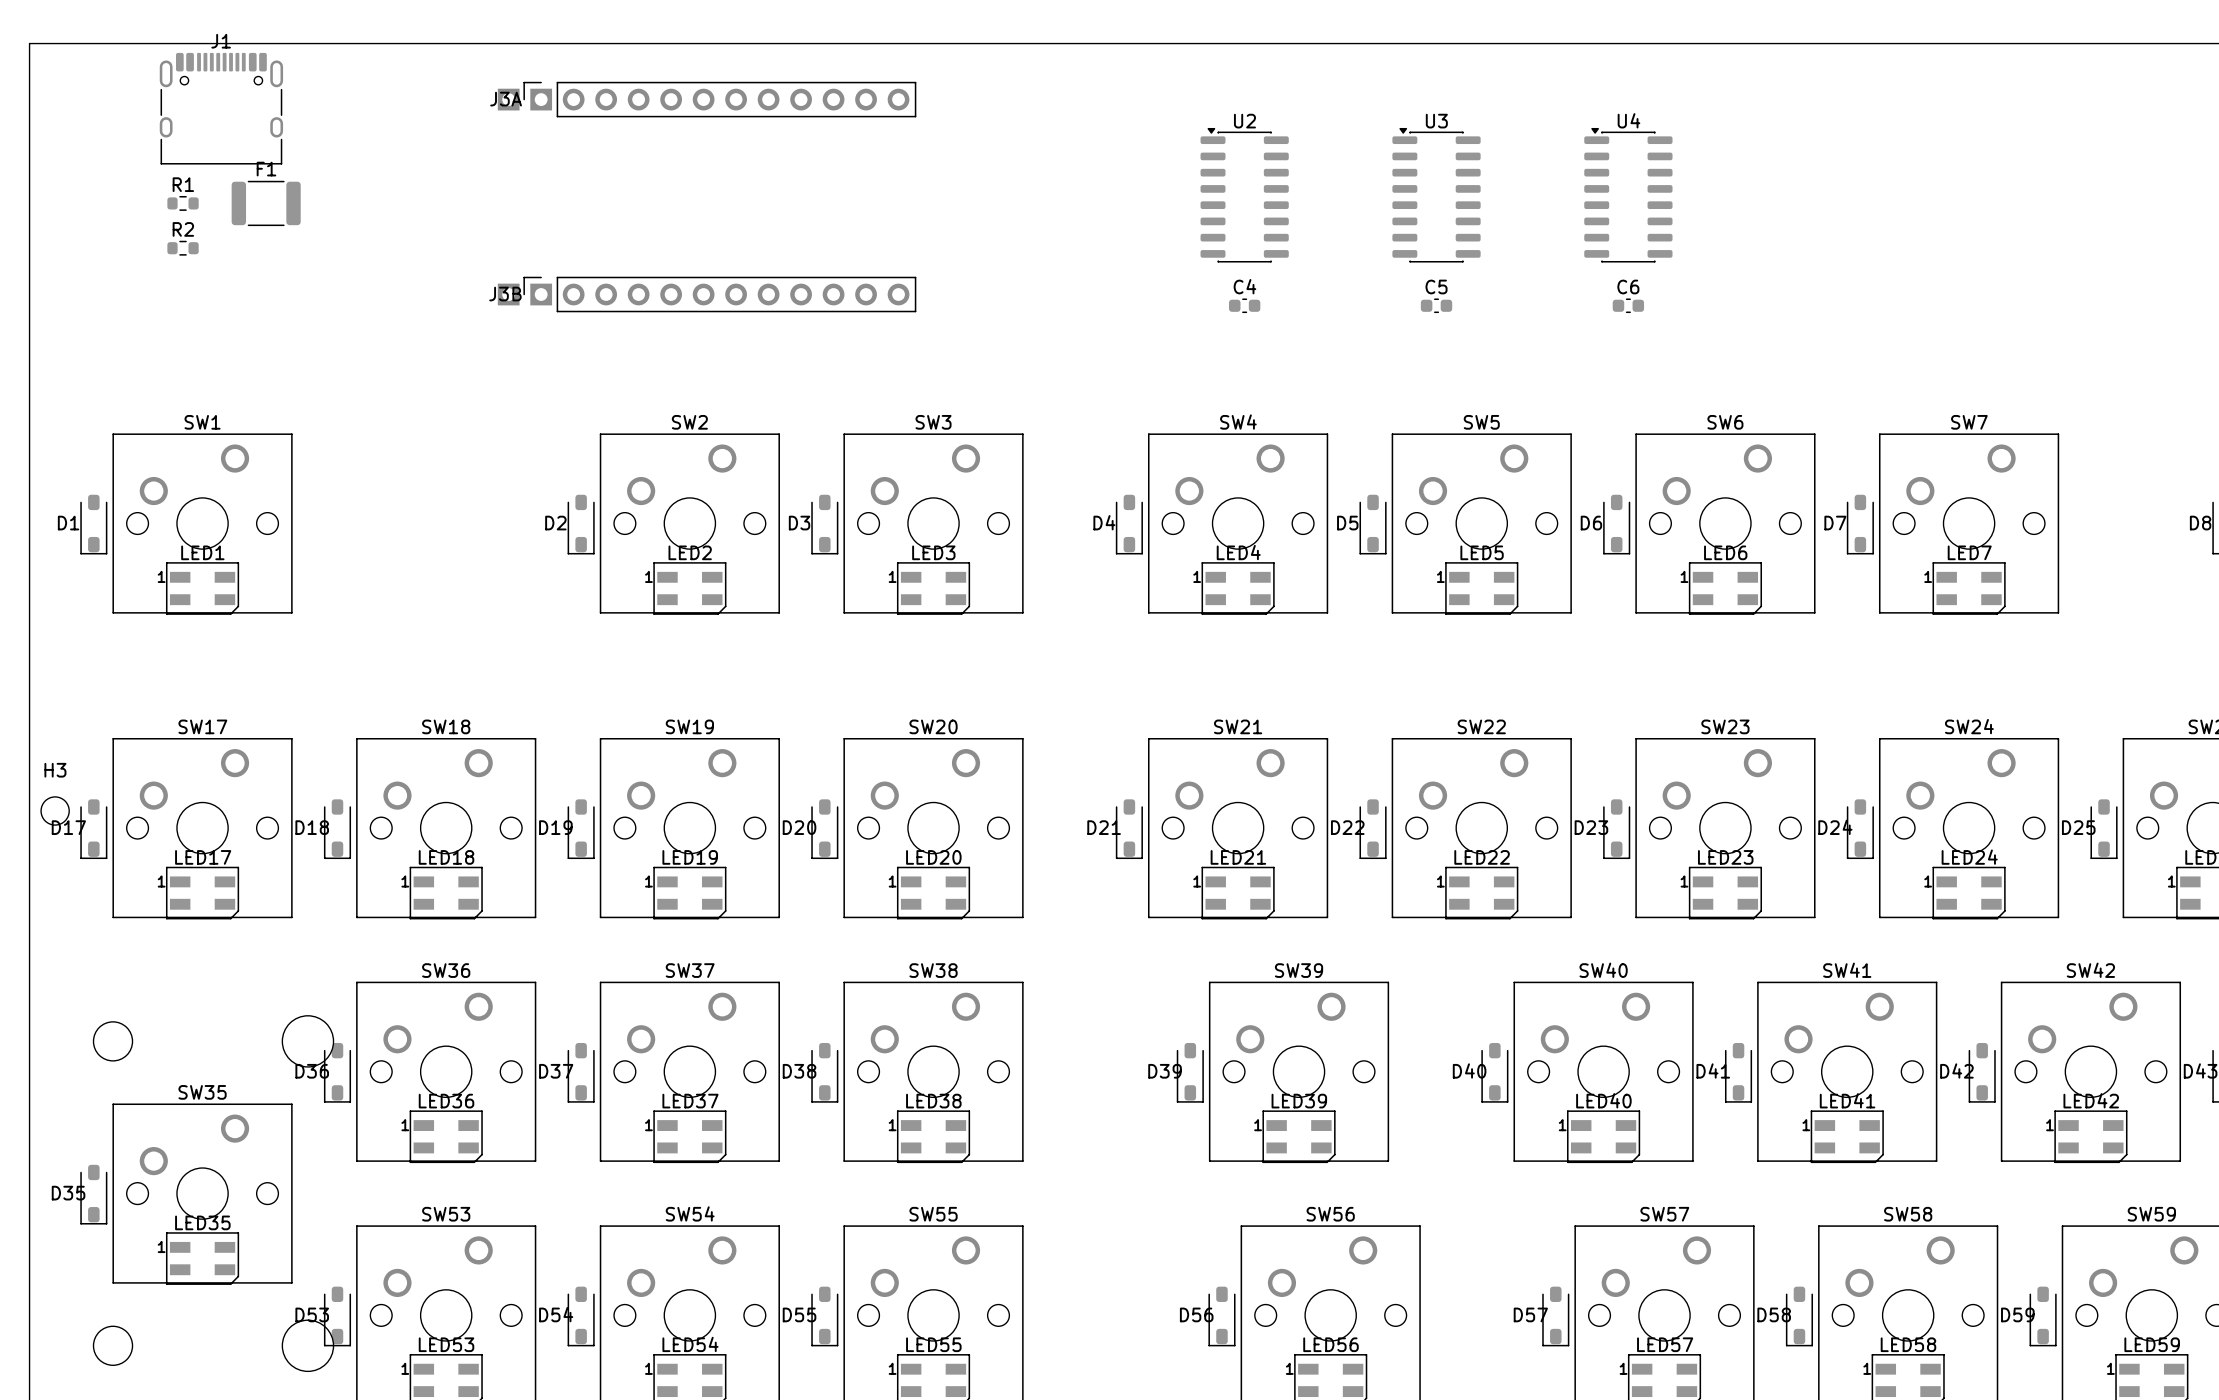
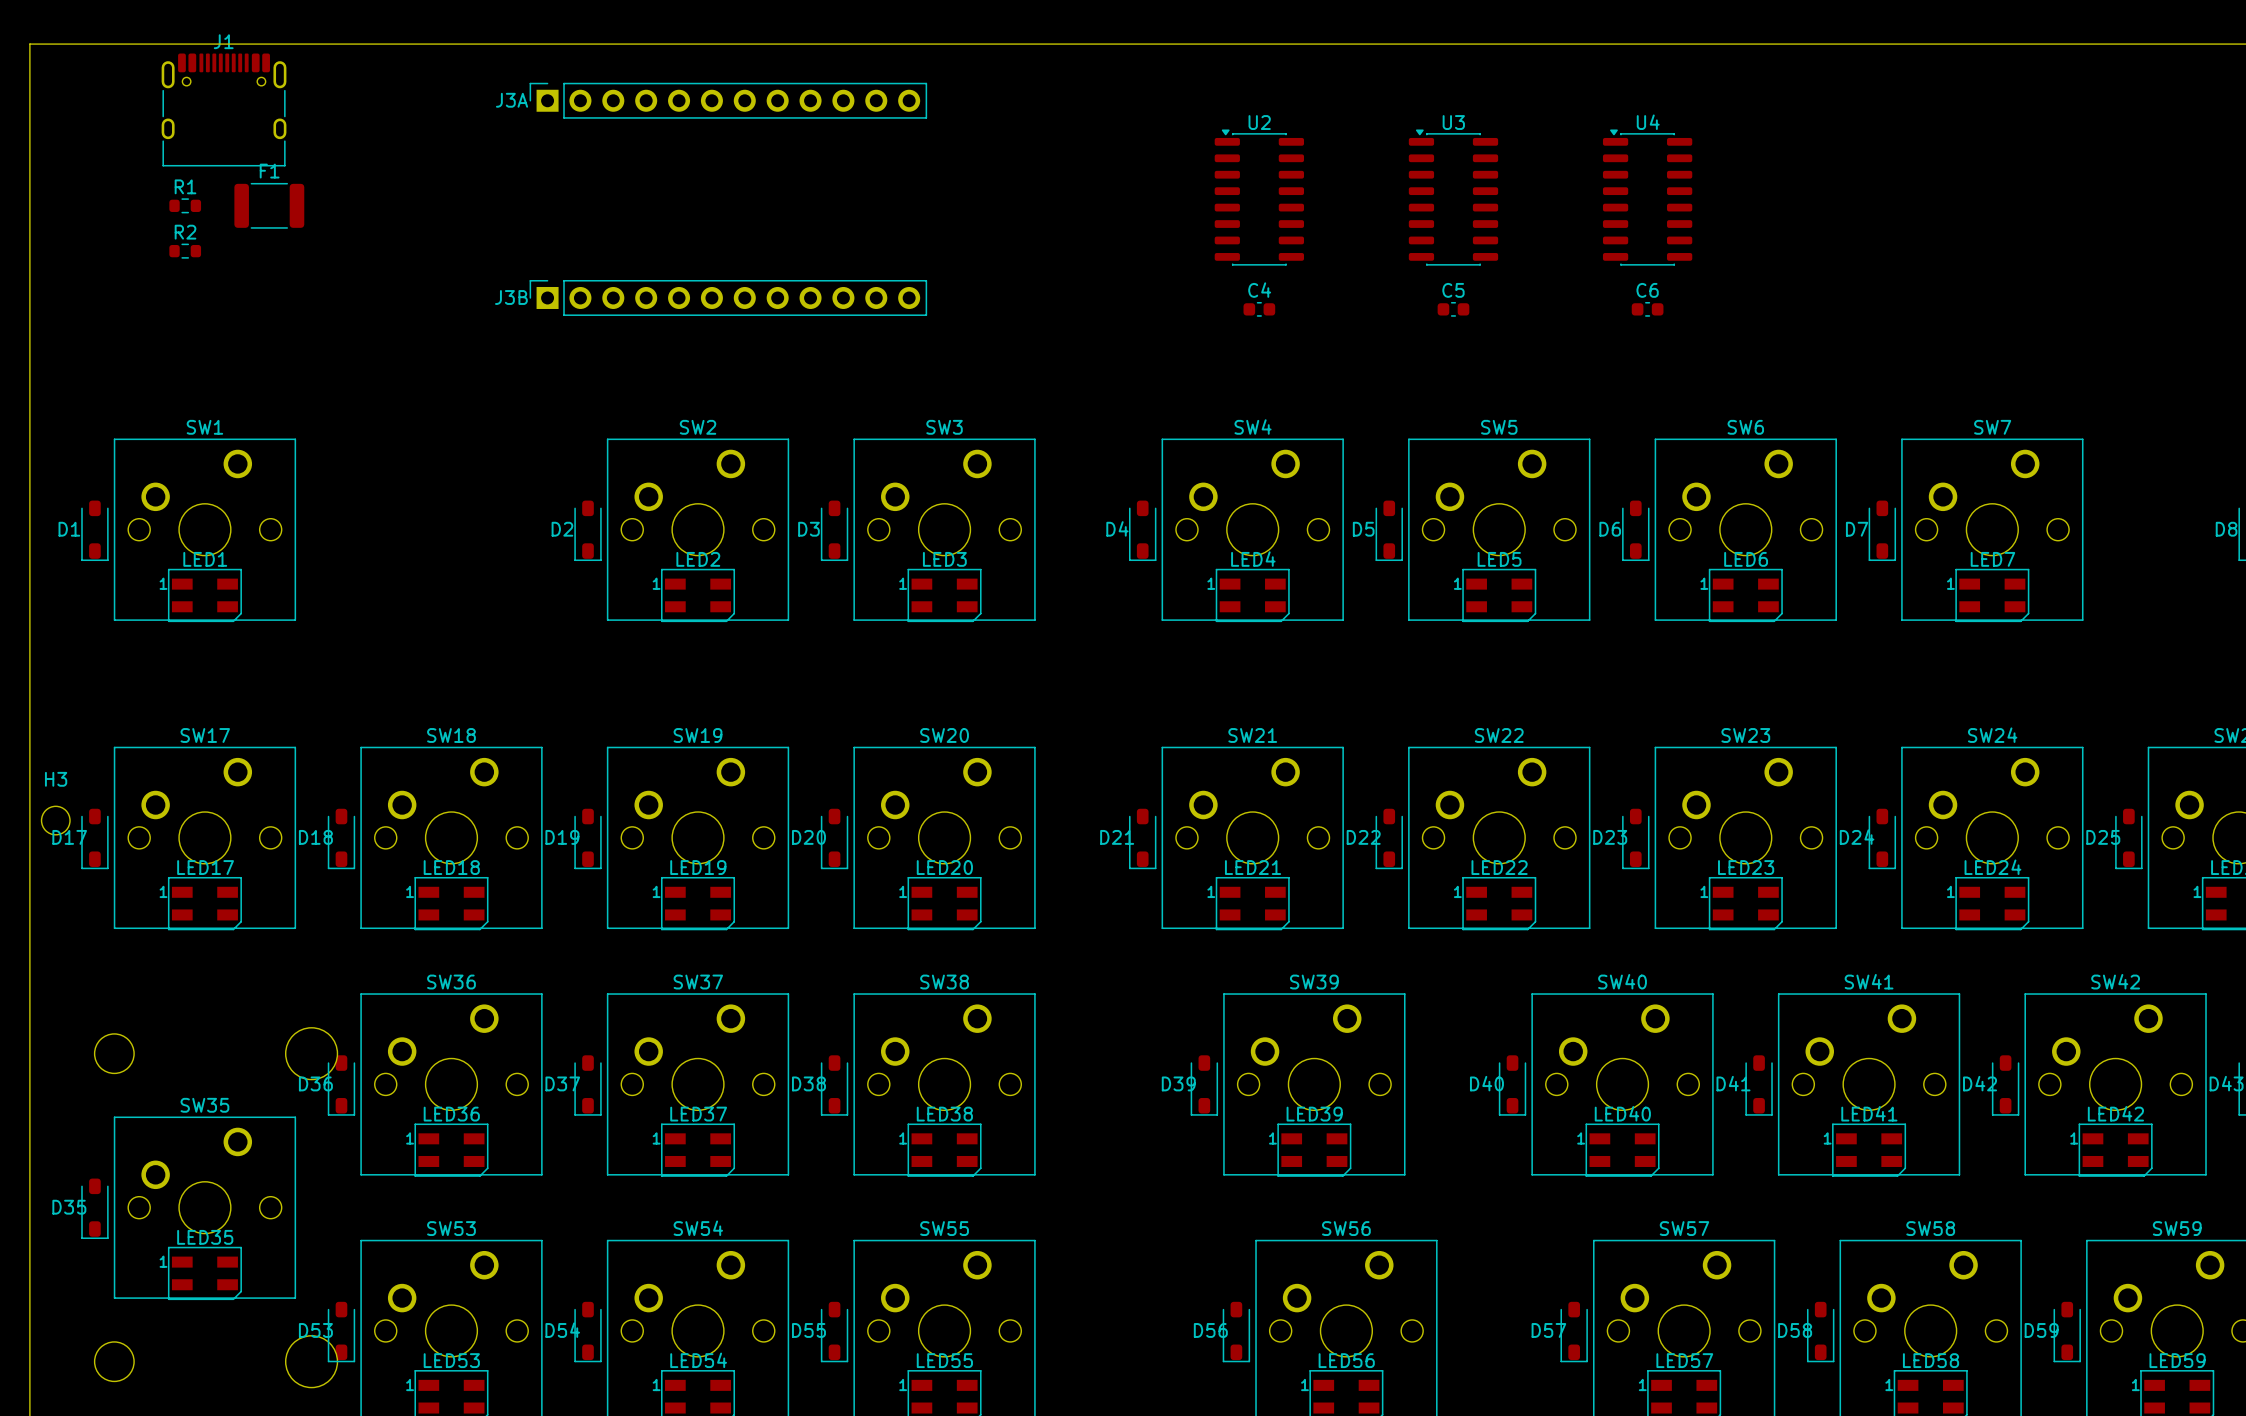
J3A footprint: [497, 81, 917, 118] -> [529, 82, 928, 119]
J3B footprint: [497, 276, 917, 313] -> [529, 279, 928, 316]

